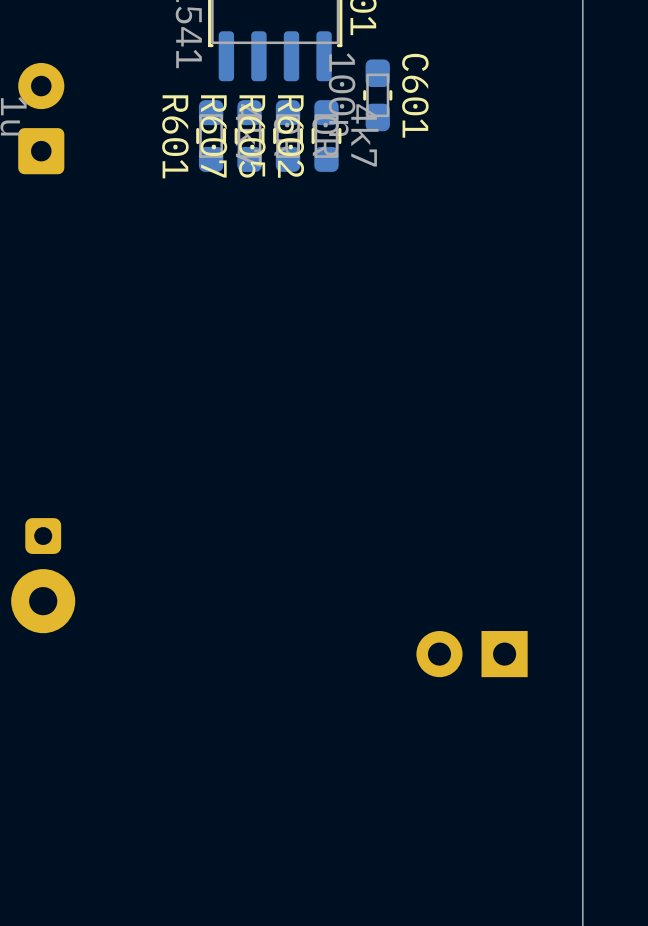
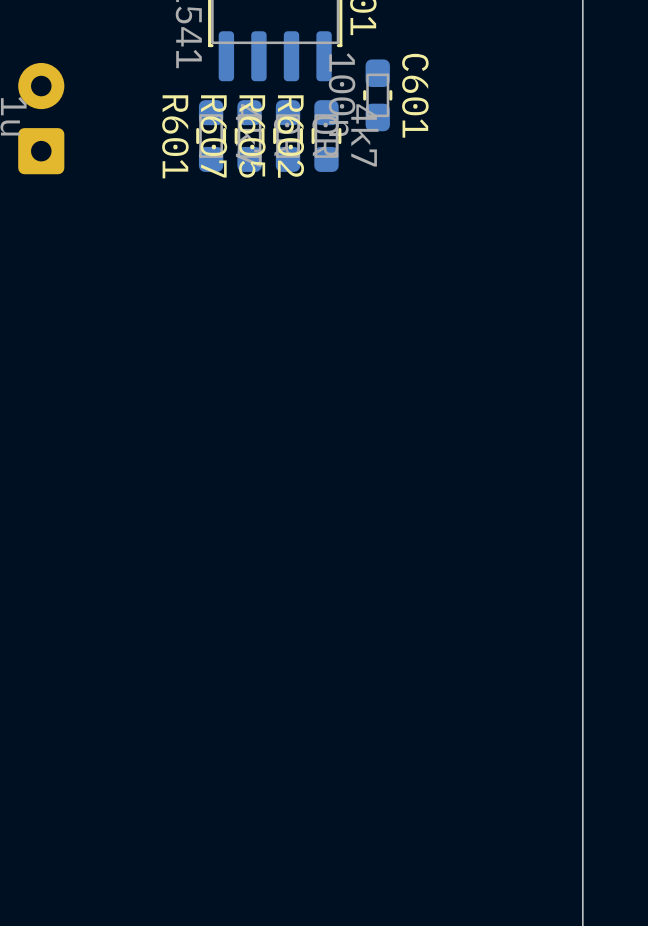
part: (43, 575) -> none
part: (472, 654) -> none

